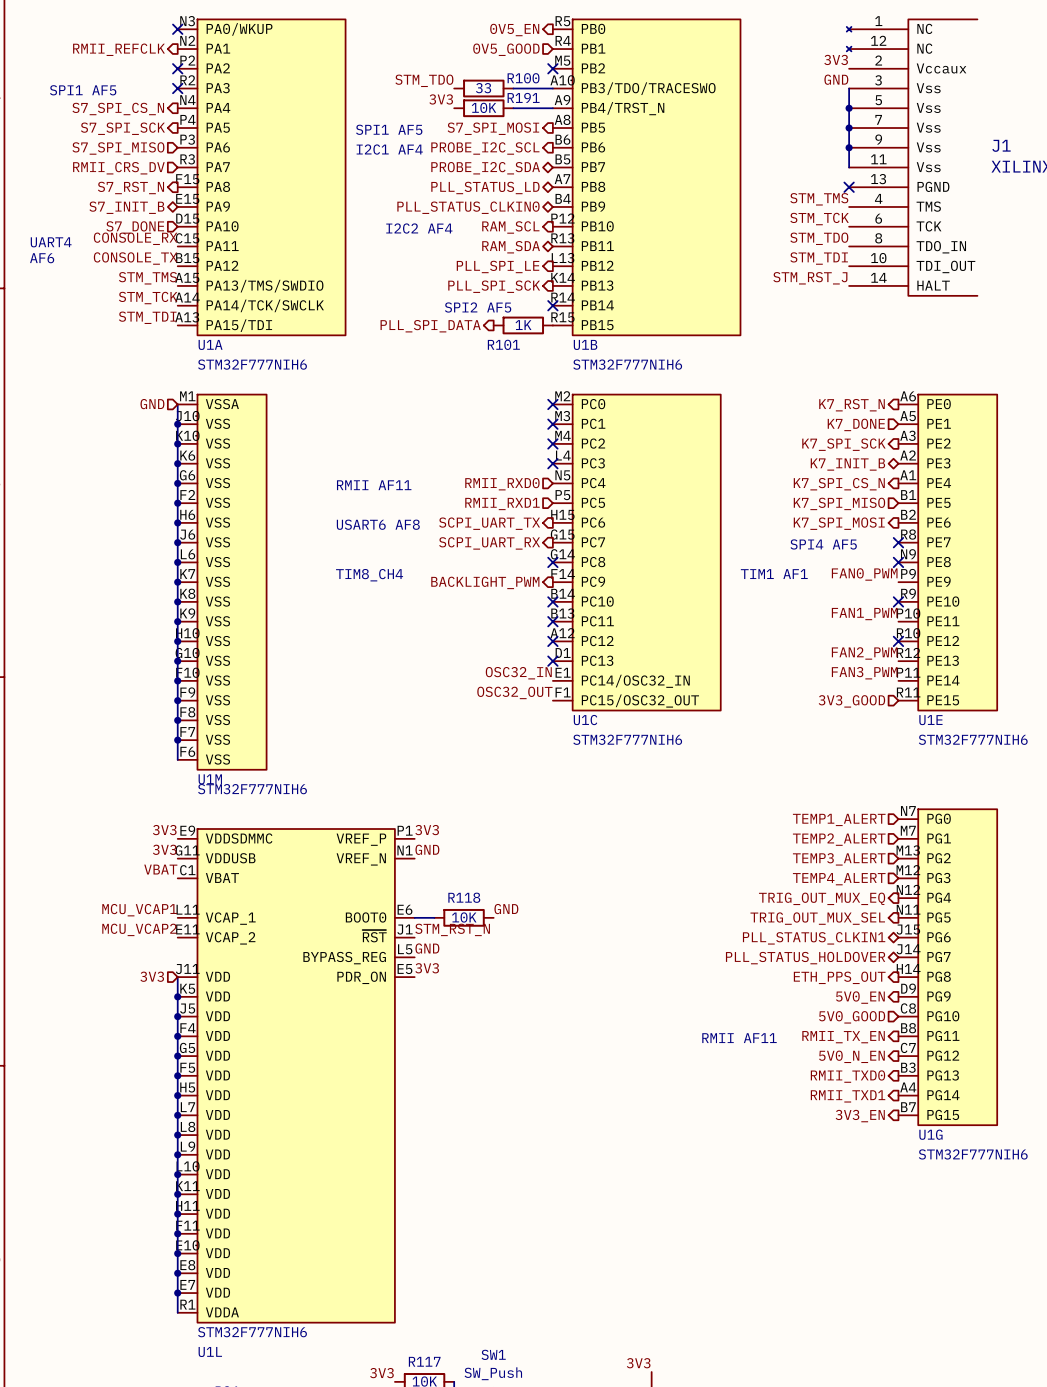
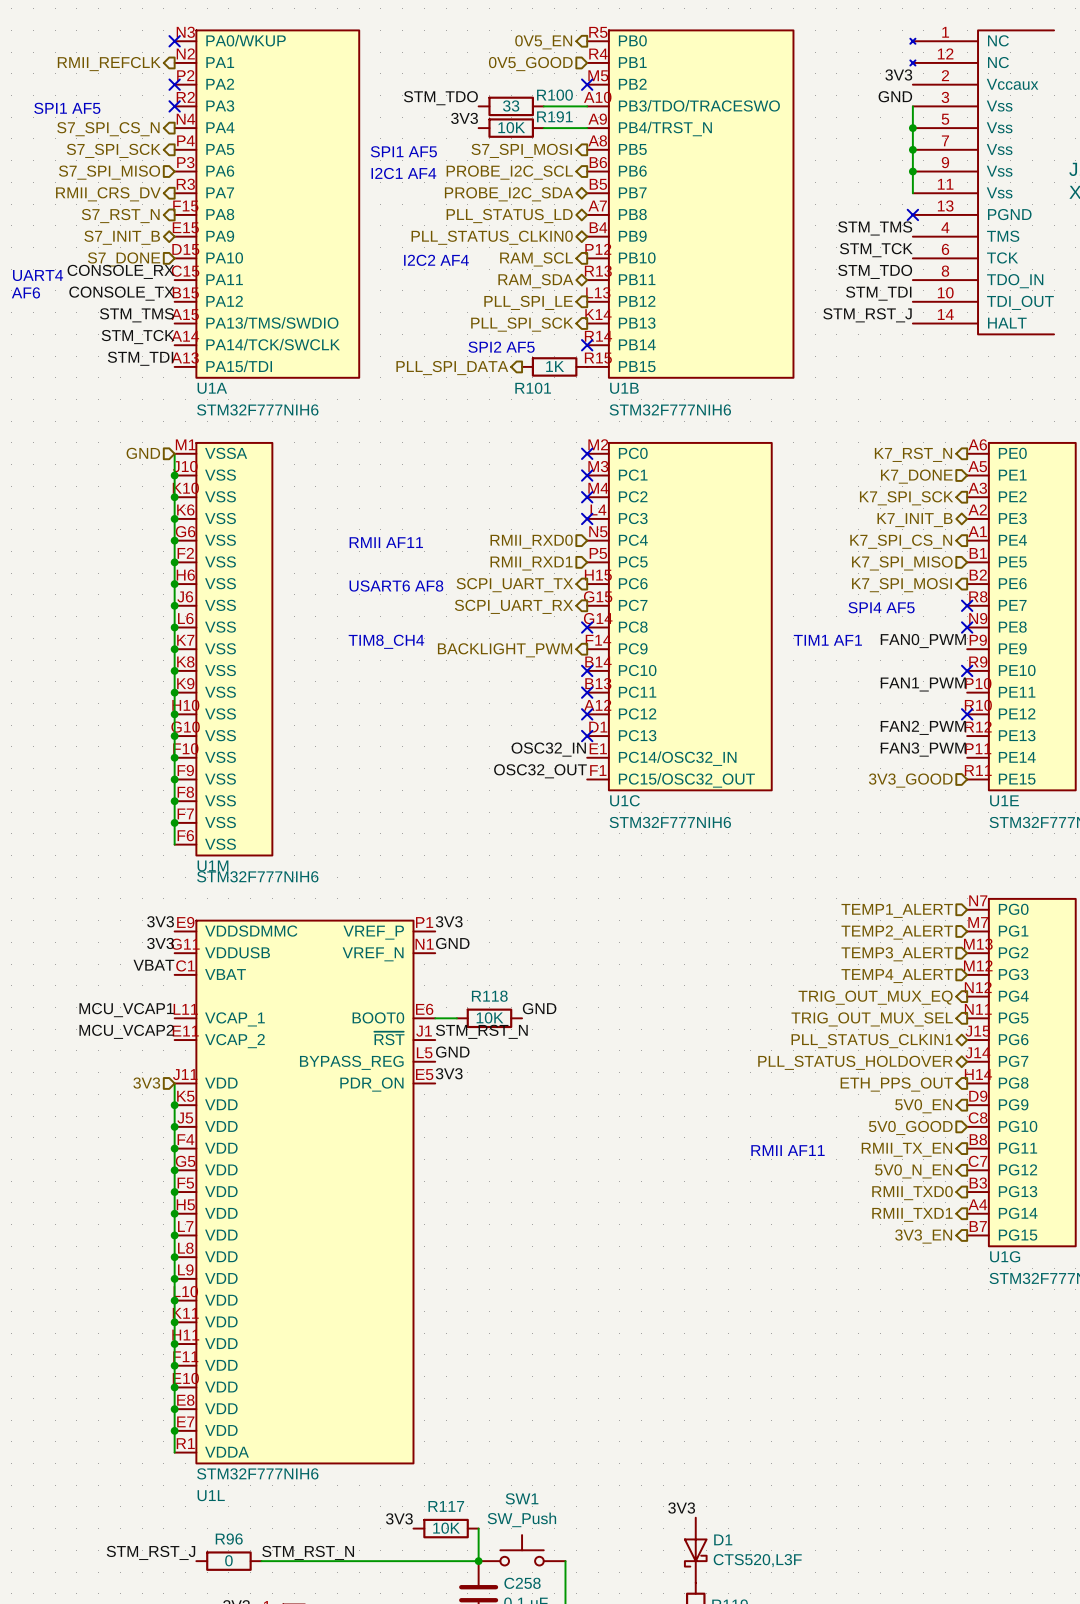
hierarchical label shape: input (118, 168) -> output (108, 194)

